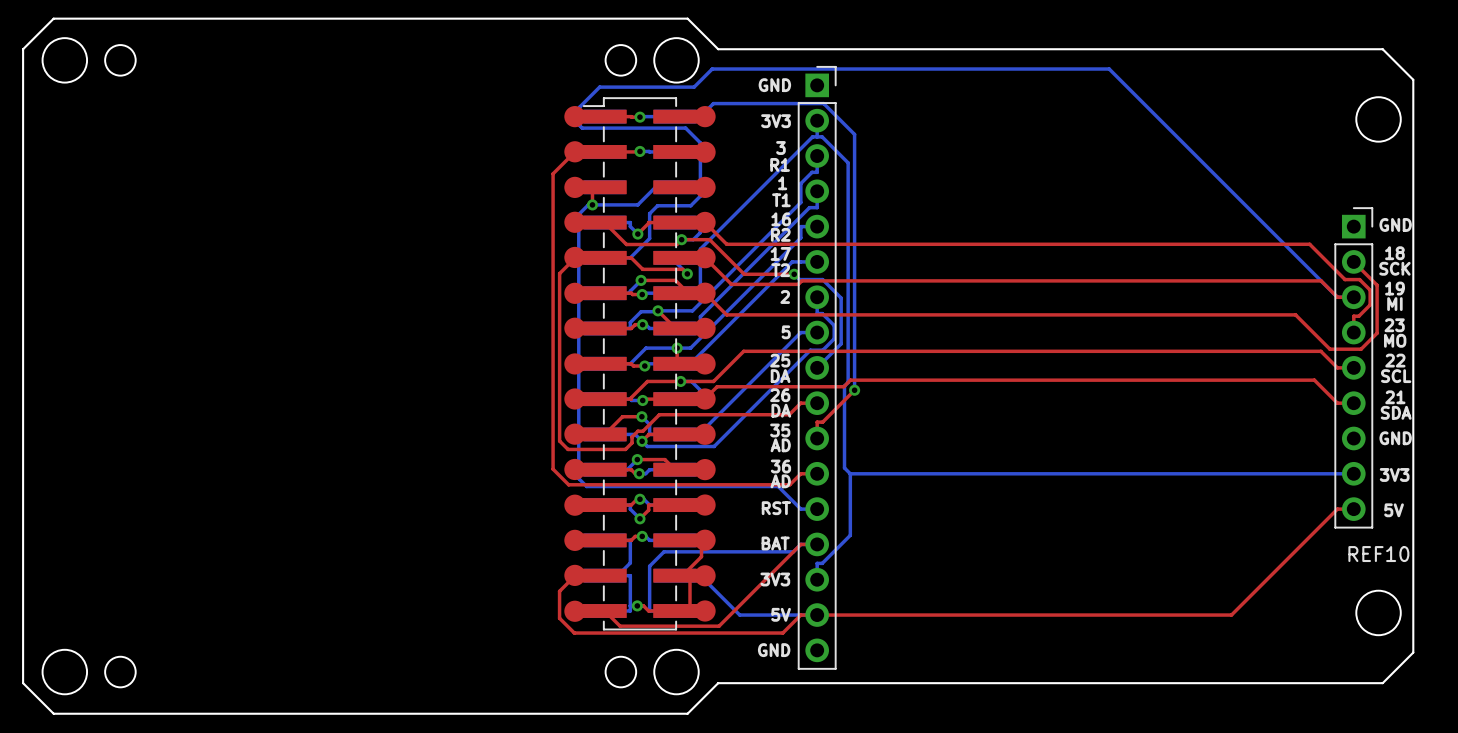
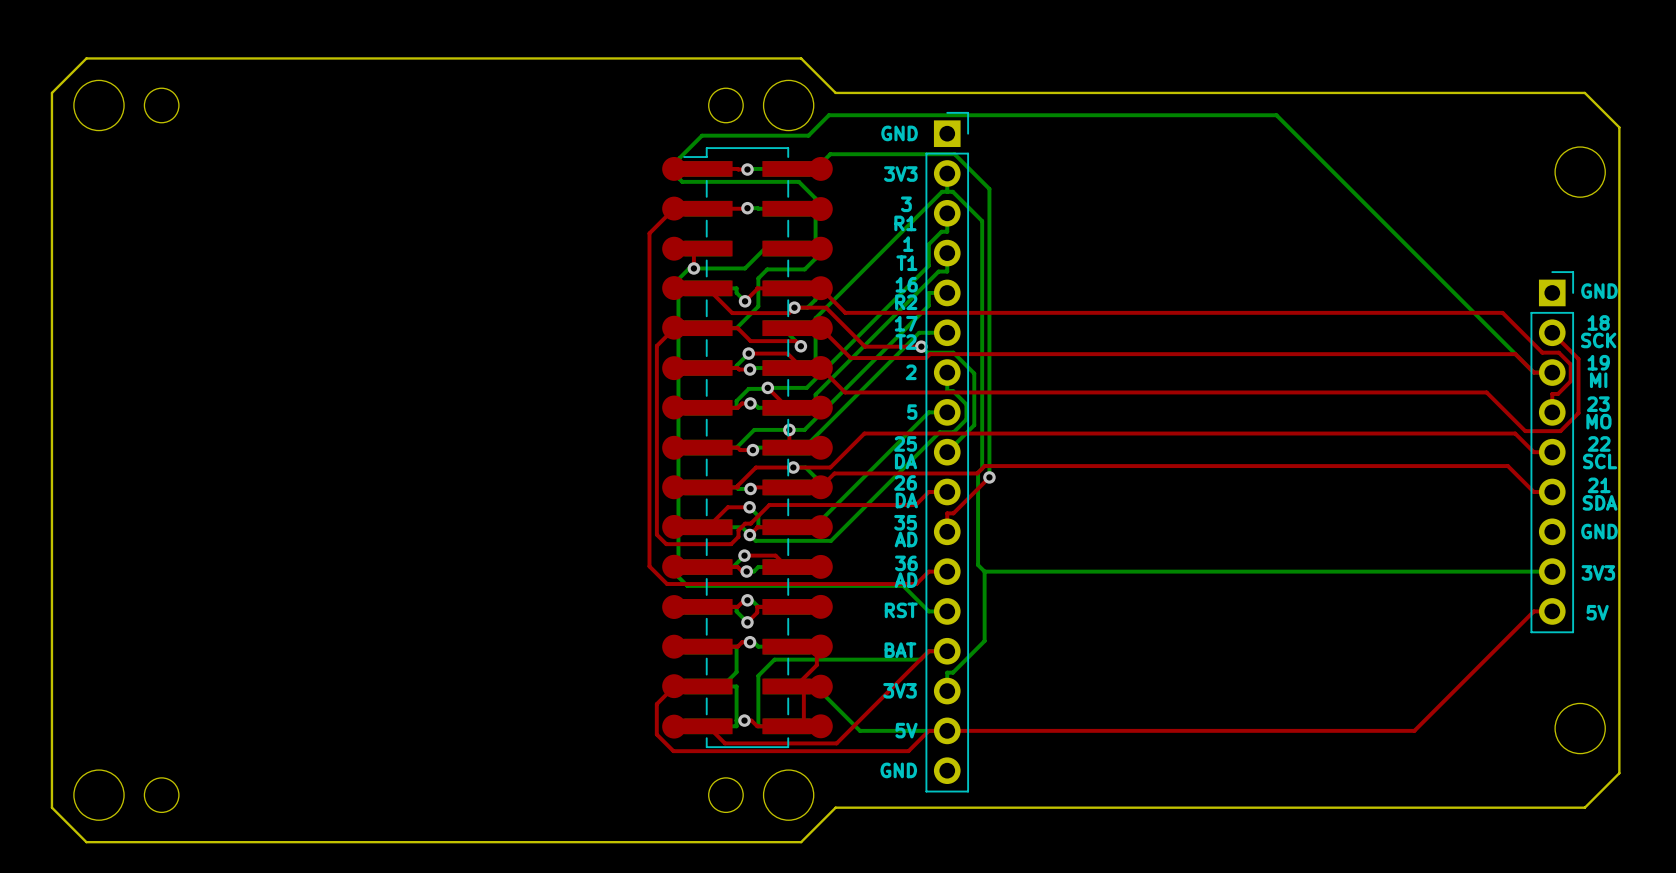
REF10 name: REF10 (1378, 554) -> none

